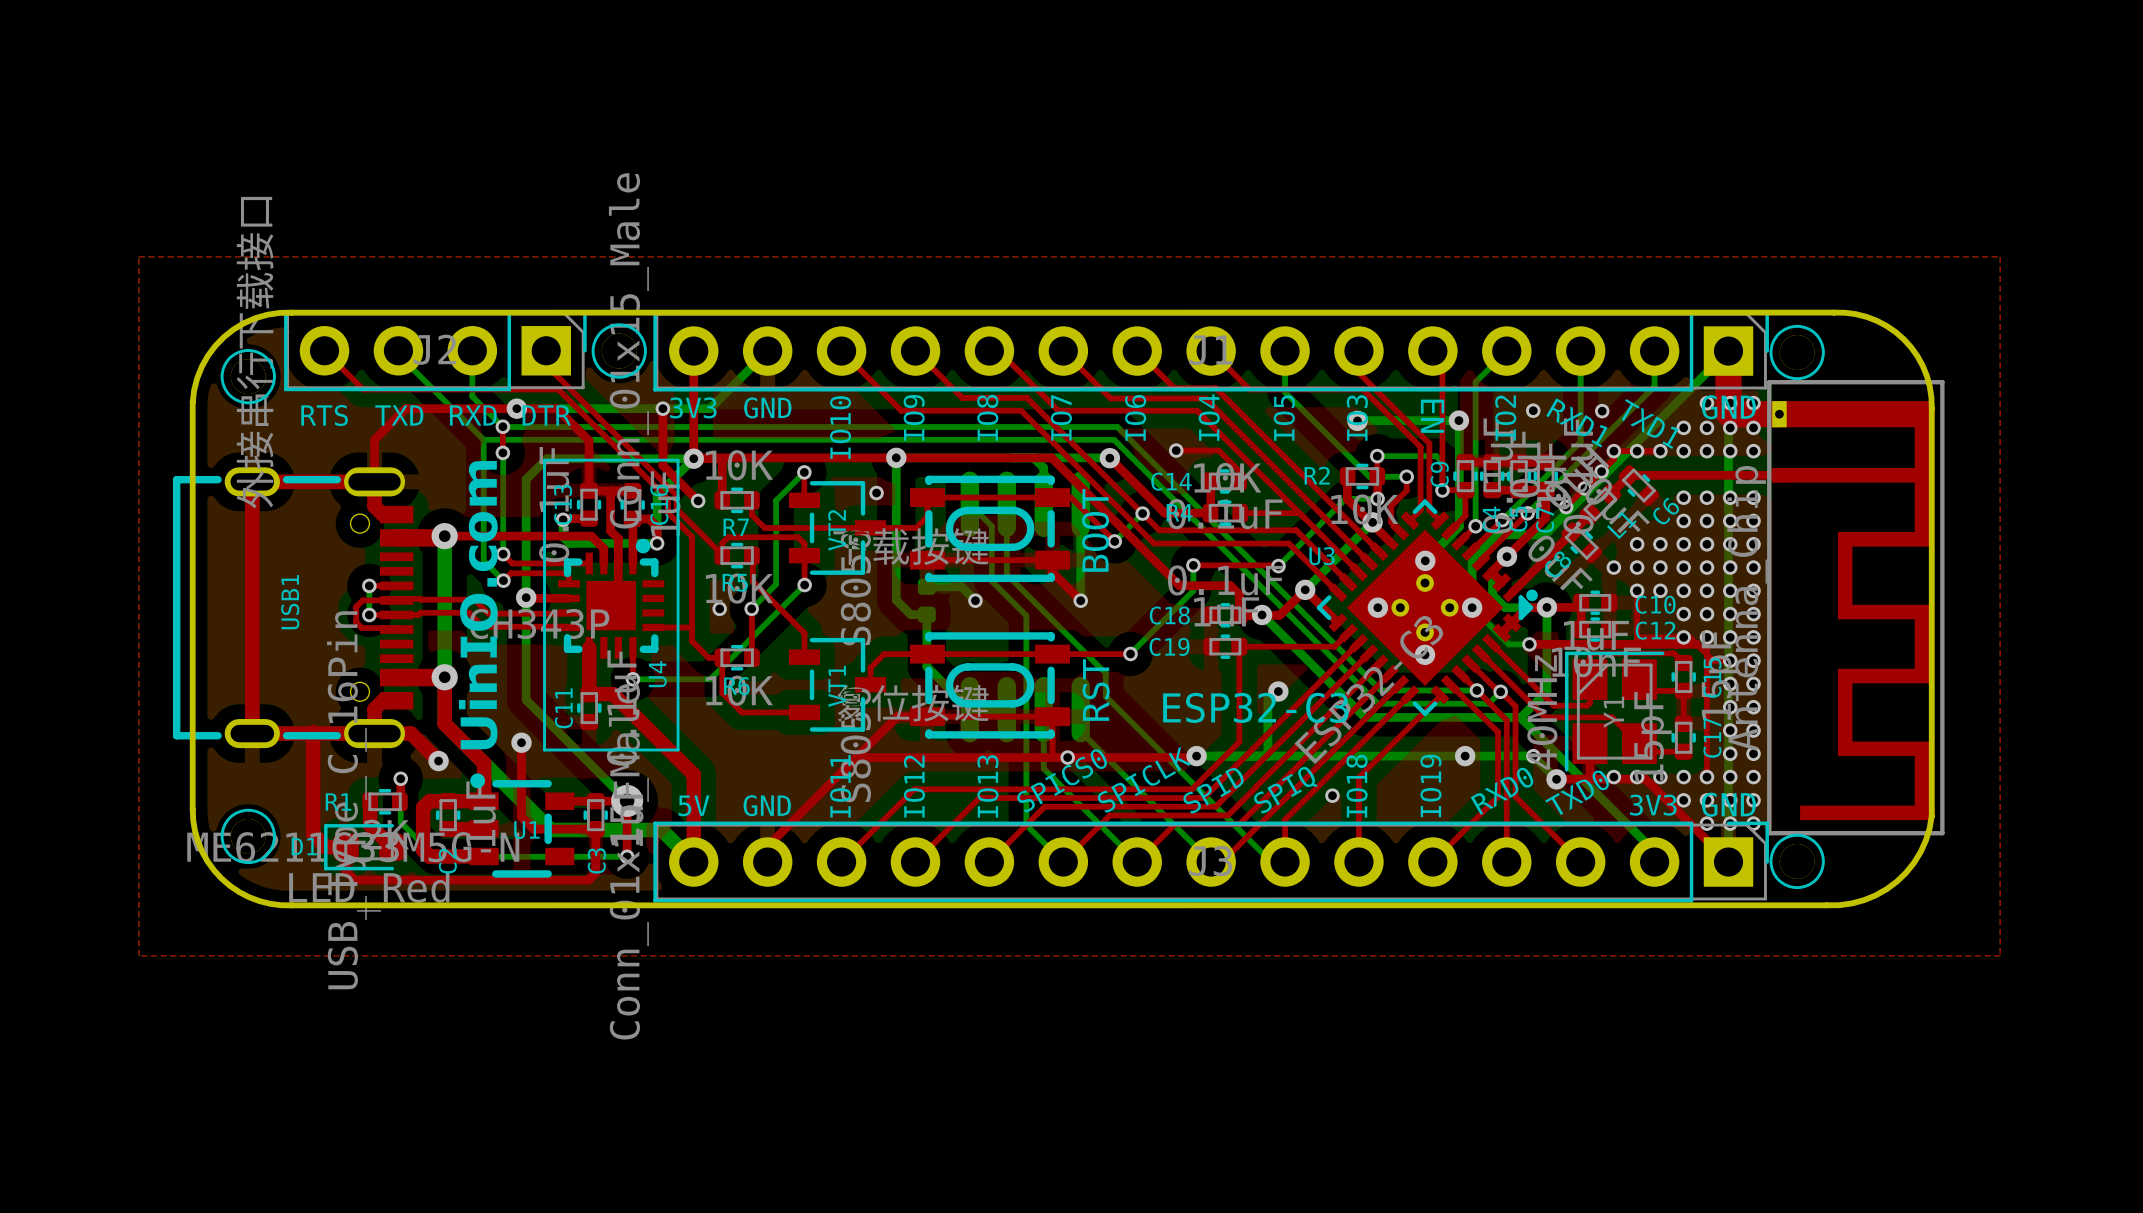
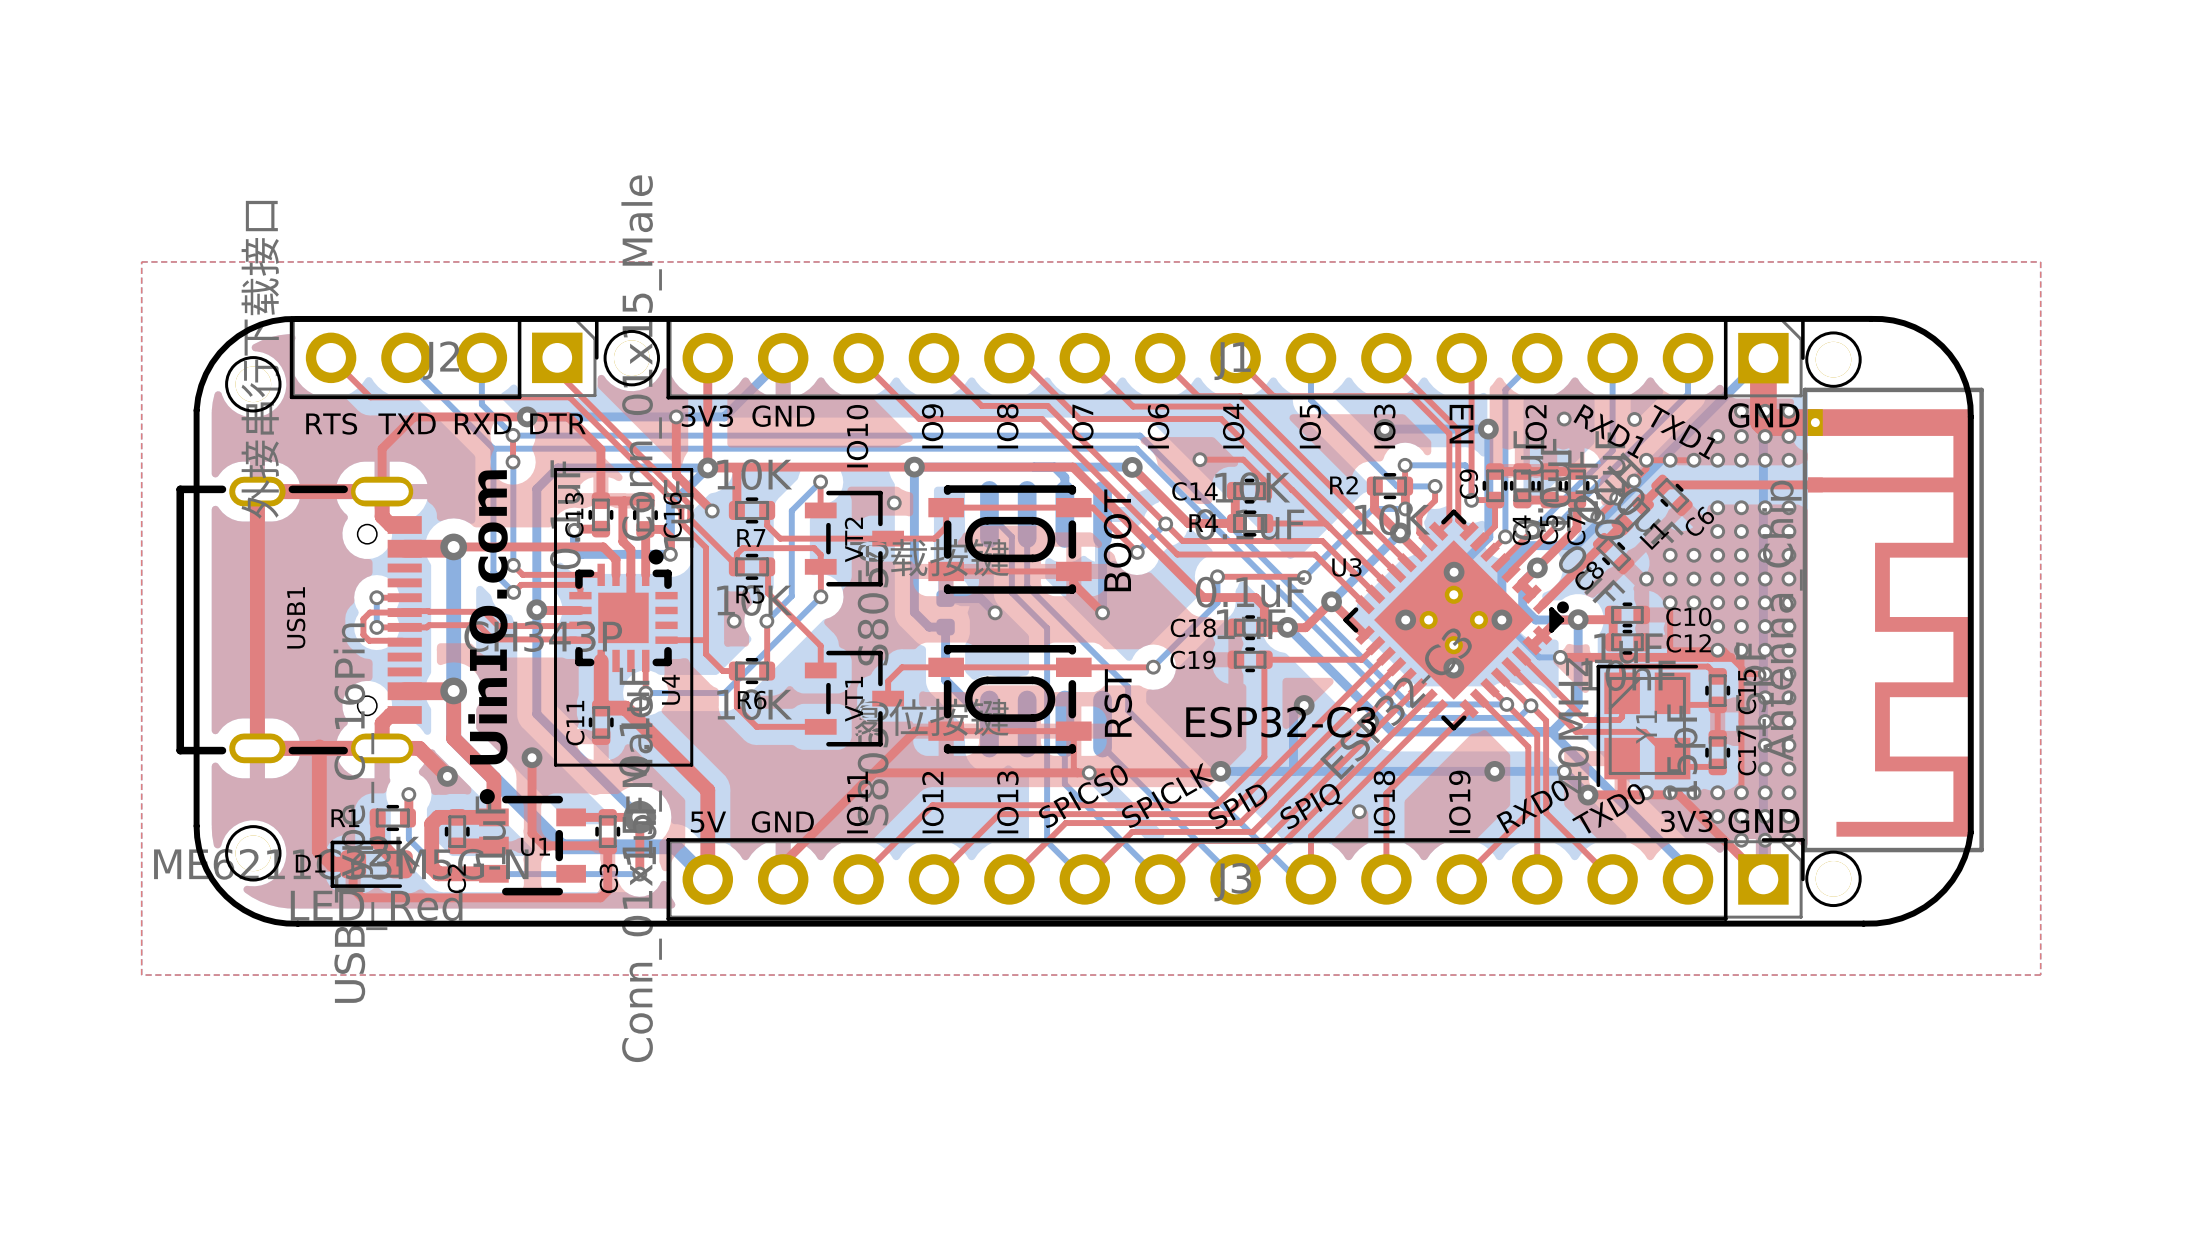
top track: (1358, 351) (1358, 373) (1429, 443) -> (1386, 358) (1458, 429) (1458, 452)
top track: (1248, 388) (1363, 389) (1420, 447) -> (1273, 396) (1411, 396) (1449, 433) (1449, 456)

